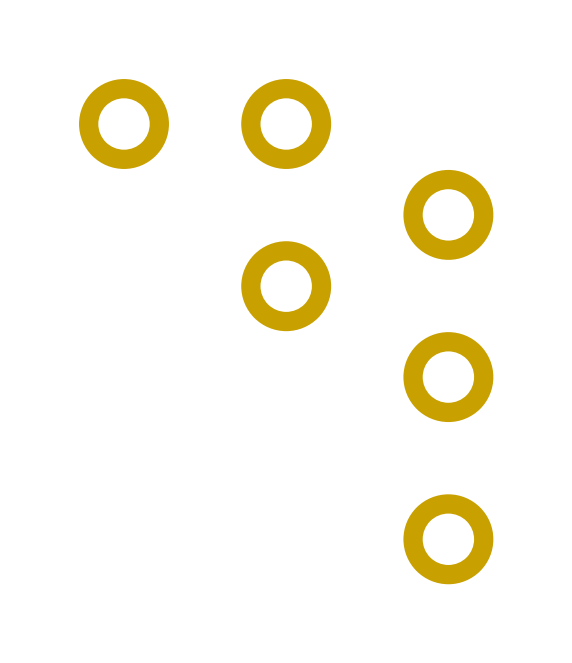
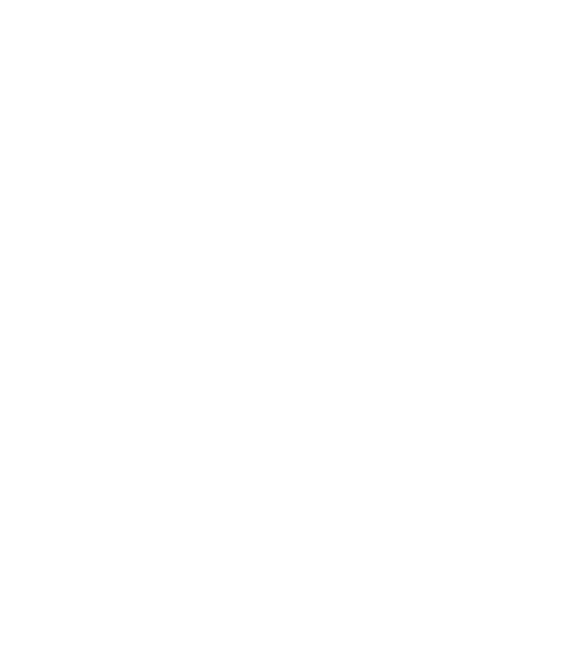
part: (124, 124) -> none
part: (286, 124) -> none
part: (448, 214) -> none
part: (286, 286) -> none
part: (448, 377) -> none
part: (448, 539) -> none

